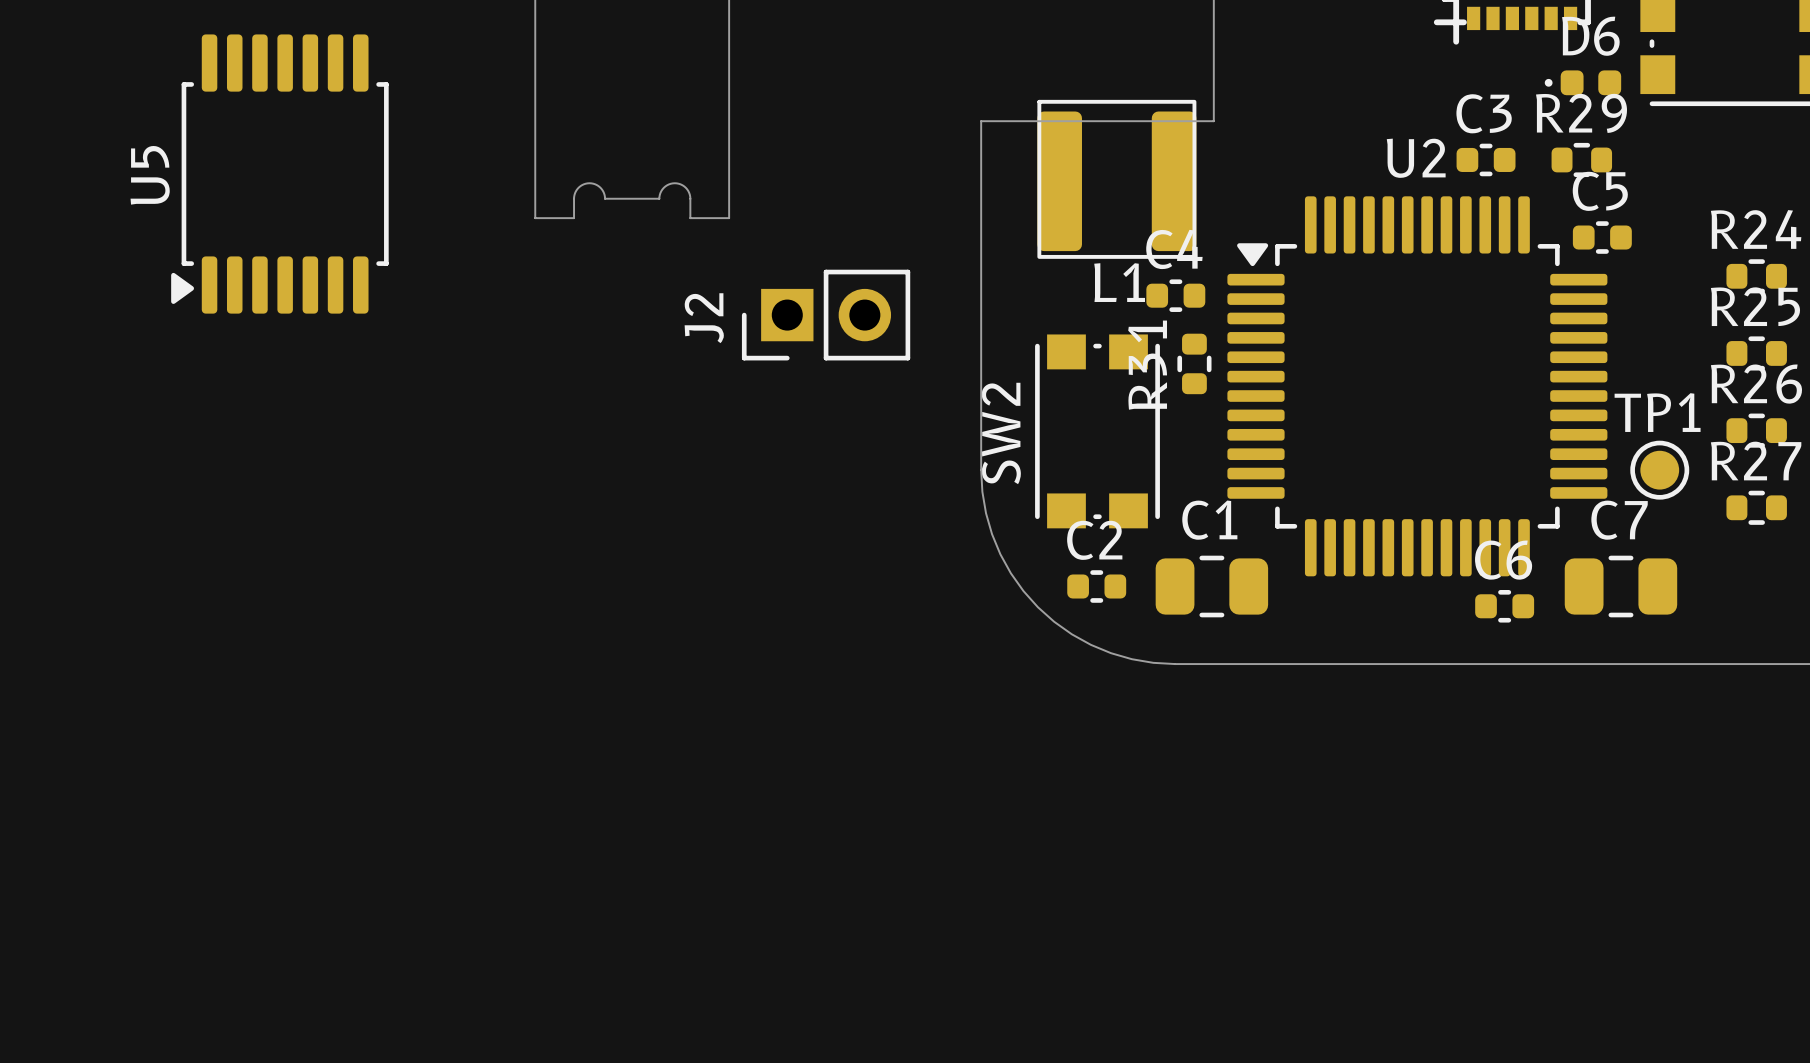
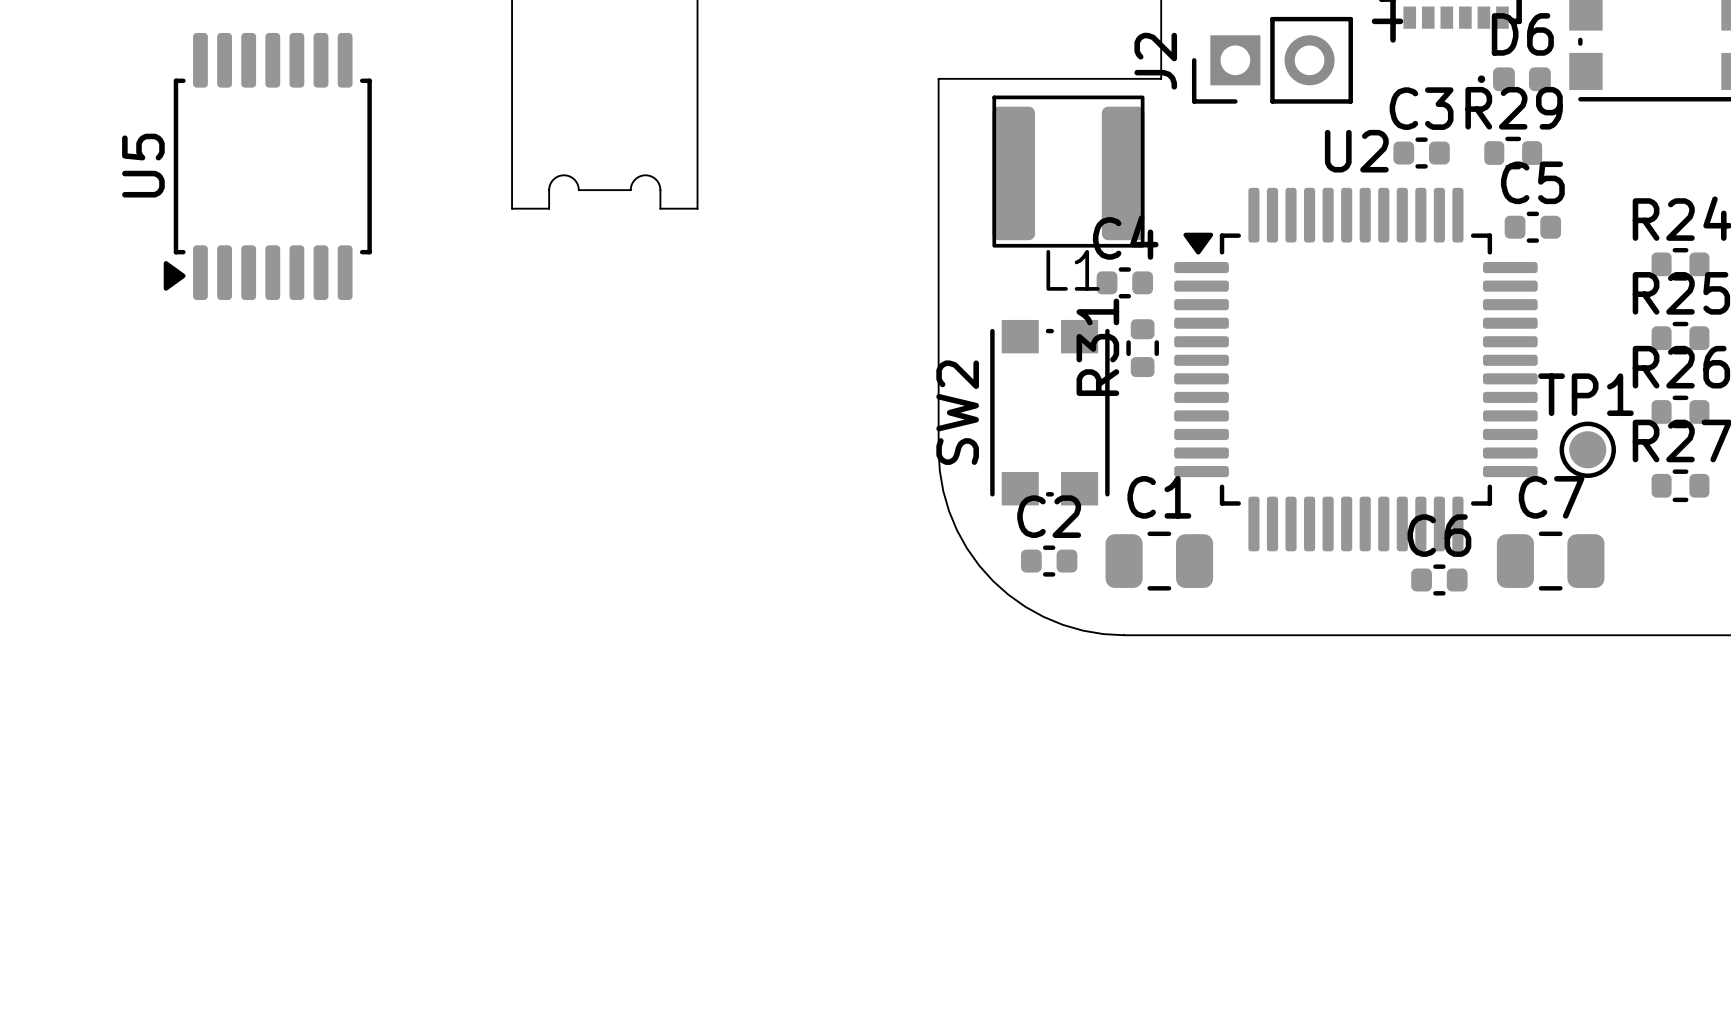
board edge: (1213, 82) (1213, 121) (981, 121) -> (1161, 78) (938, 78) (938, 115)
J2 position: (826, 315) -> (1272, 60)

